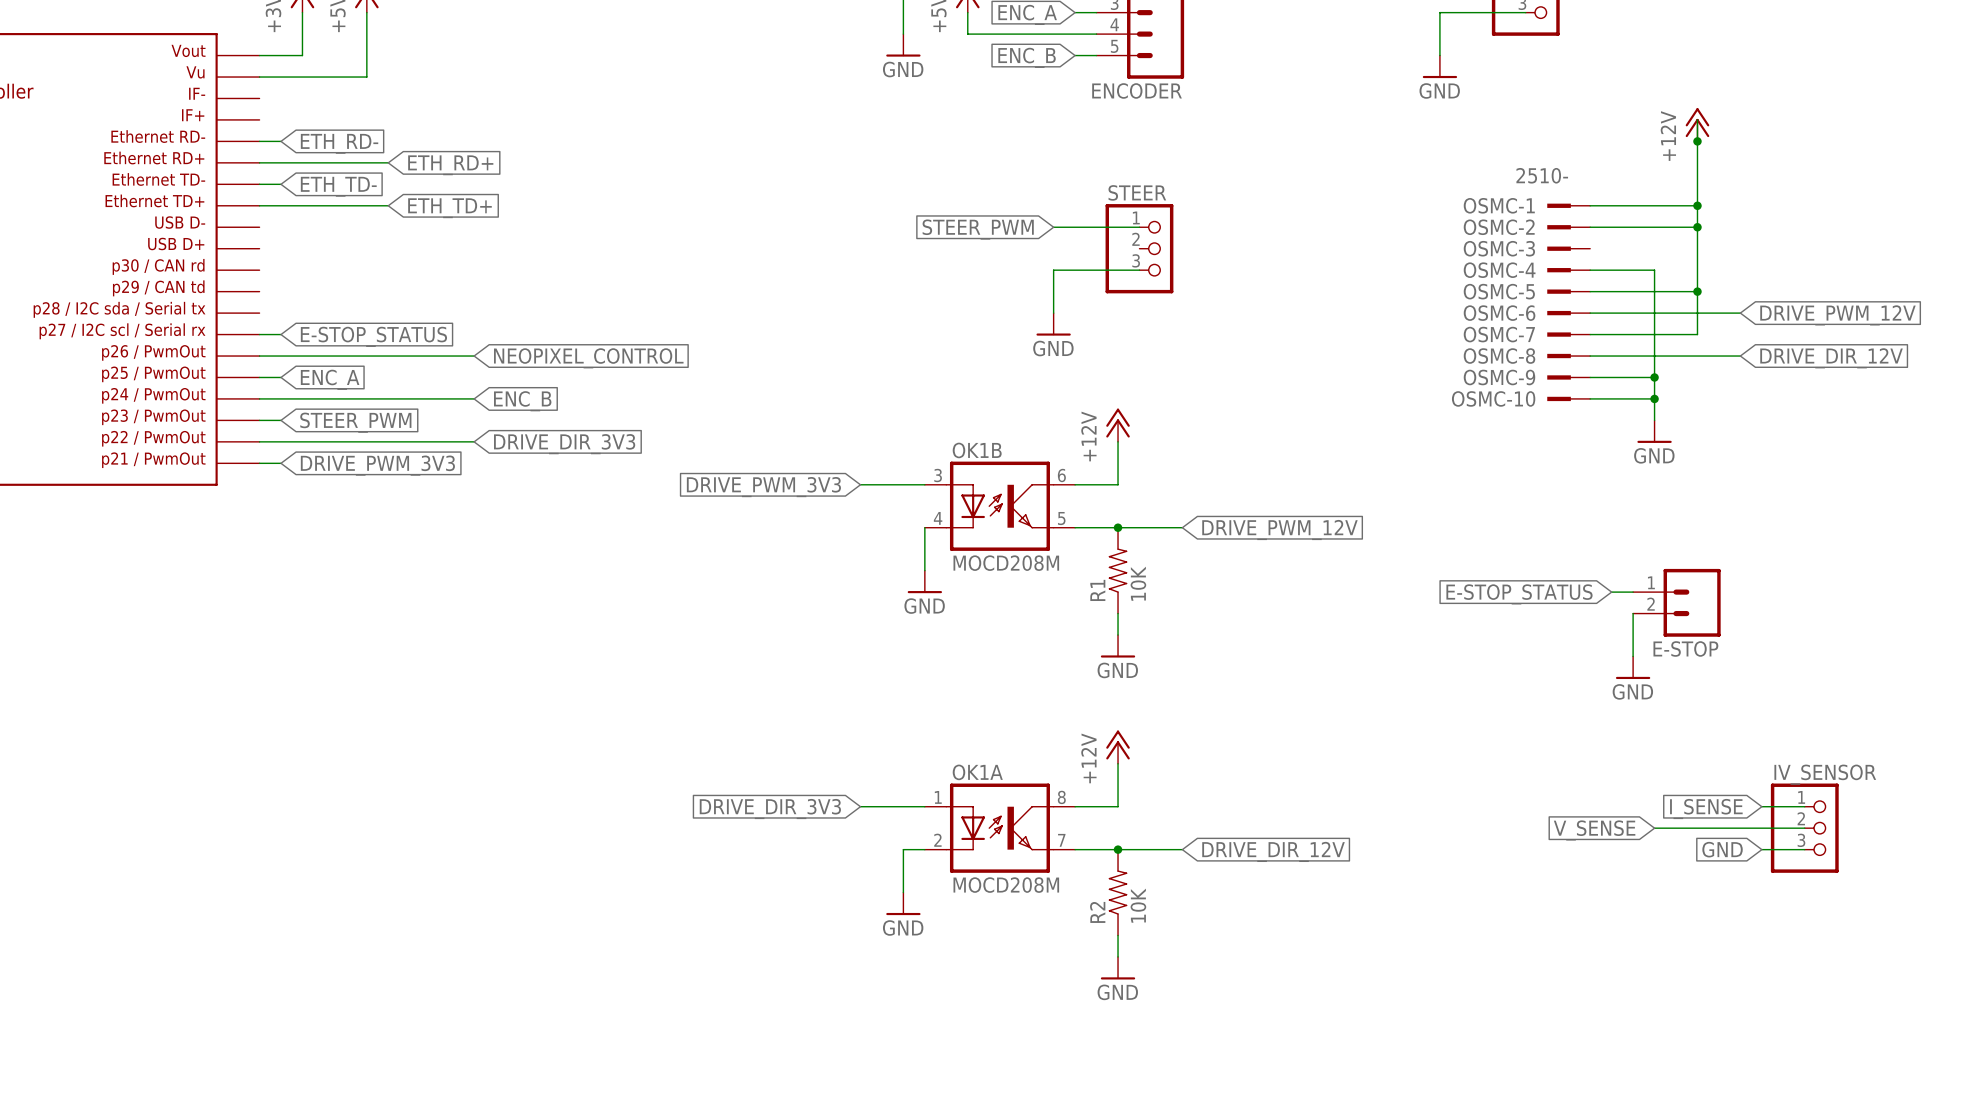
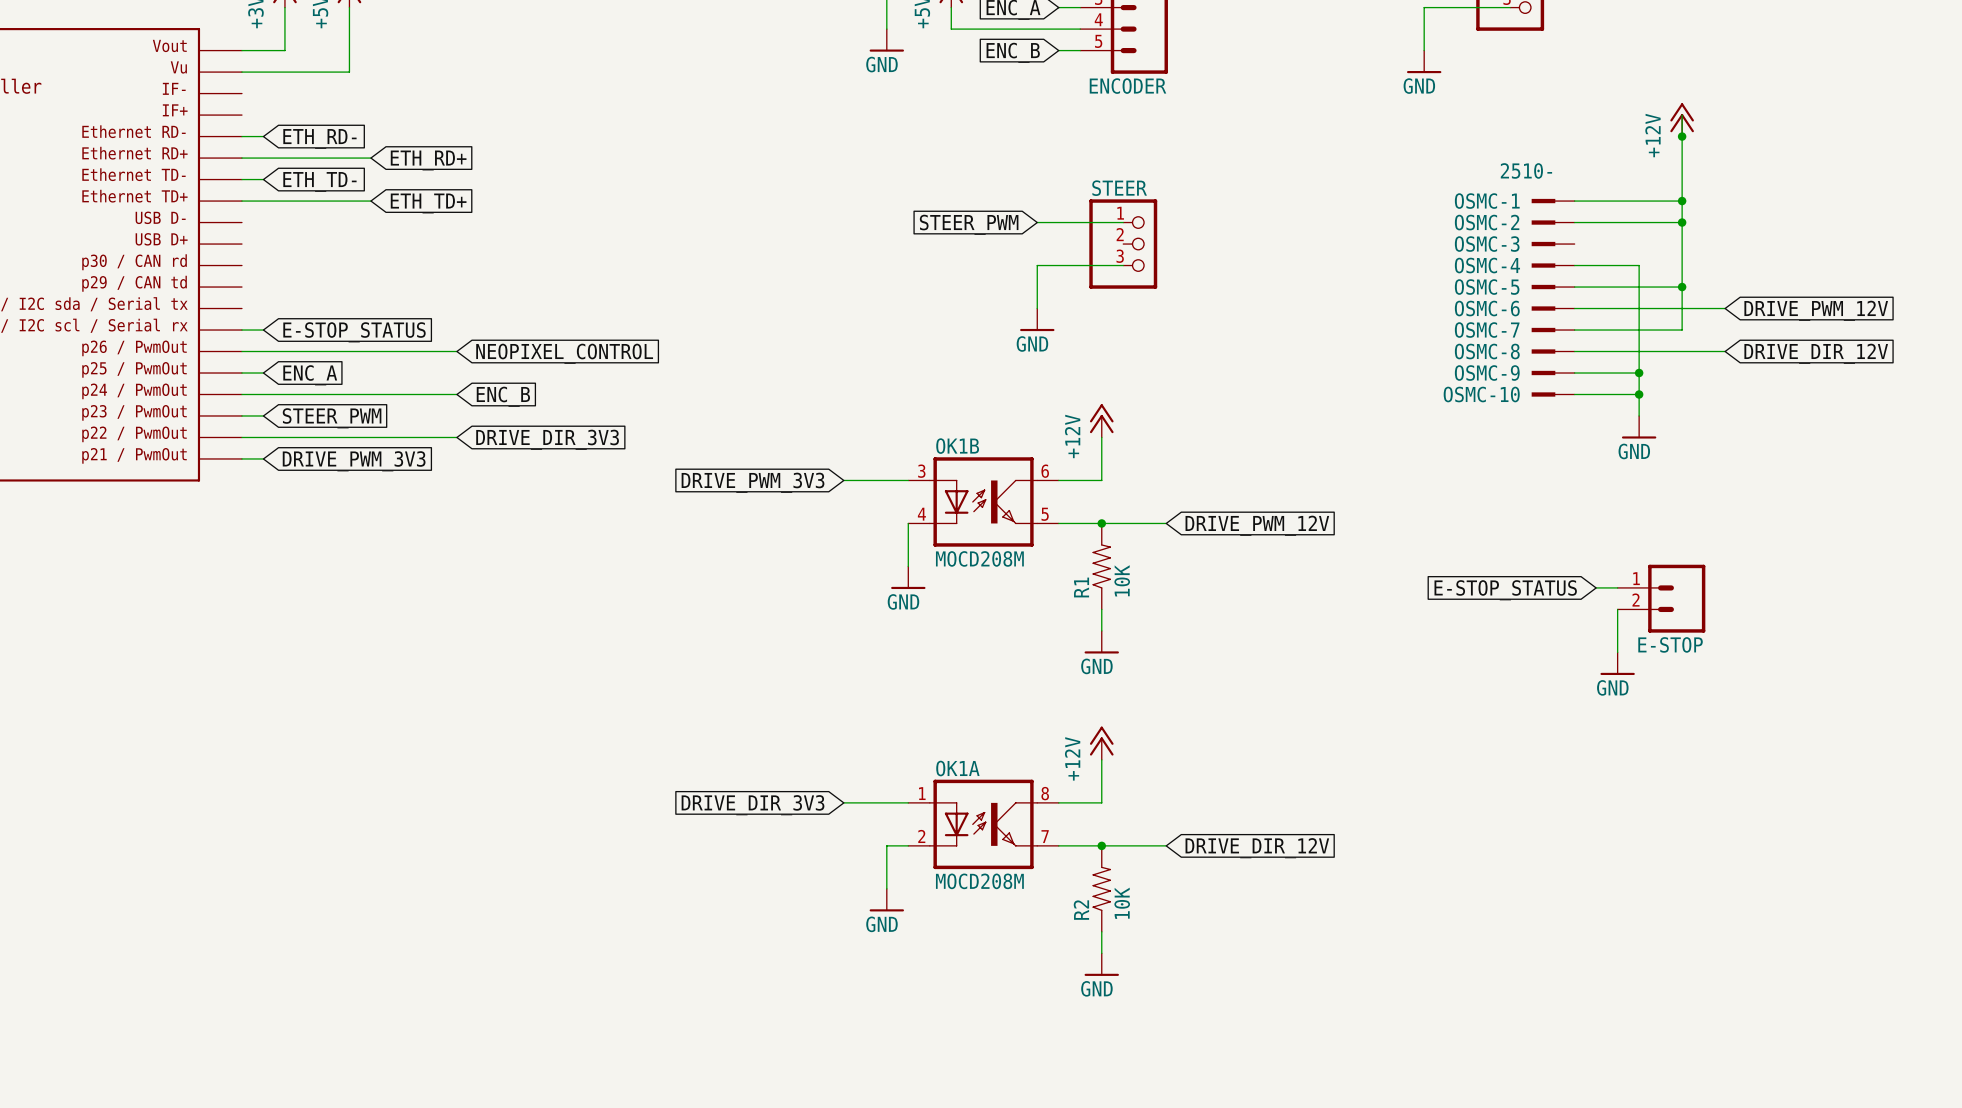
wire: (1761, 806) (1804, 806) -> none
global label: I_SENSE (1706, 809) -> none
wire: (1654, 828) (1804, 828) -> none
IV_SENSOR: (1804, 828) -> none
global label: V_SENSE (1594, 830) -> none
global label: GND (1722, 849) -> none
wire: (1761, 849) (1804, 849) -> none

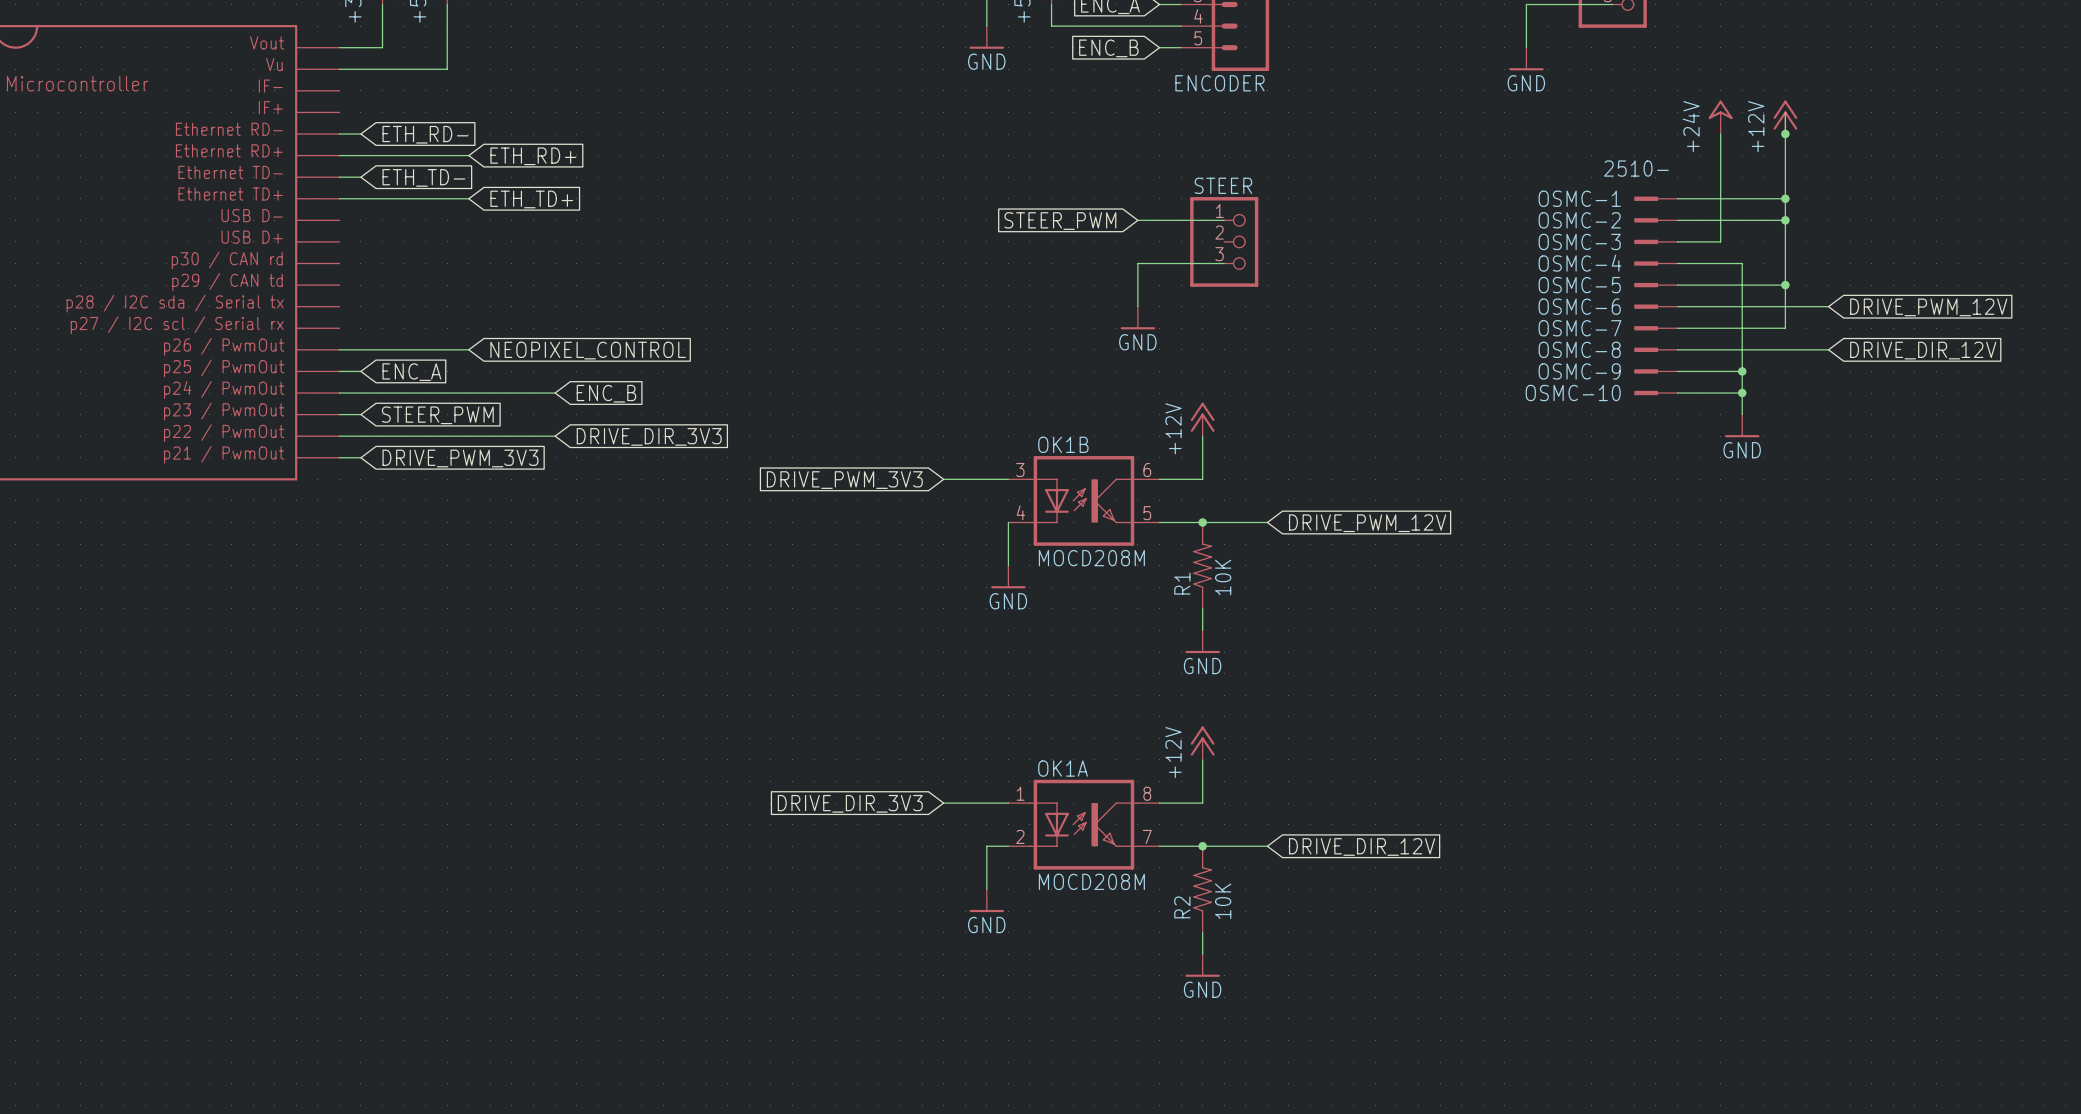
power symbol: none -> +24V (1720, 117)
wire: none -> (1720, 134) (1720, 241) (1677, 241)
wire: (241, 330) (263, 330) -> none
global label: E-STOP_STATUS (354, 332) -> none
wire: (370, 351) (456, 351) -> none
global label position: NEOPIXEL_CONTROL (564, 353) -> NEOPIXEL_CONTROL (588, 350)
wire: (1596, 587) (1617, 587) -> none
global label: E-STOP_STATUS (1505, 590) -> none
E-STOP: (1661, 598) -> none
wire: (1617, 609) (1617, 652) -> none
power symbol: GND (1617, 663) -> none

